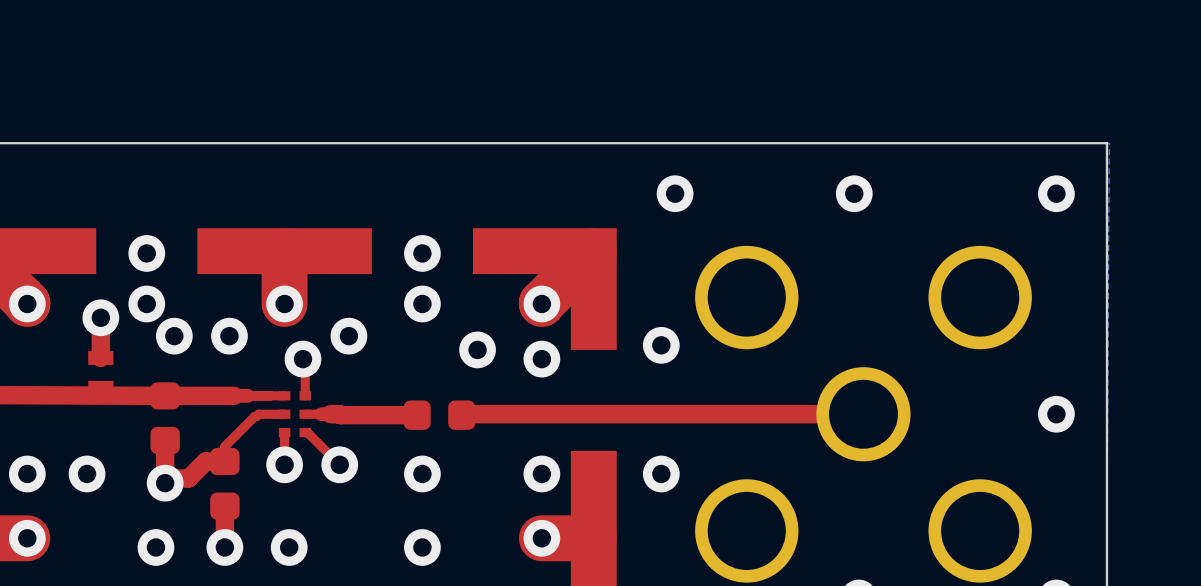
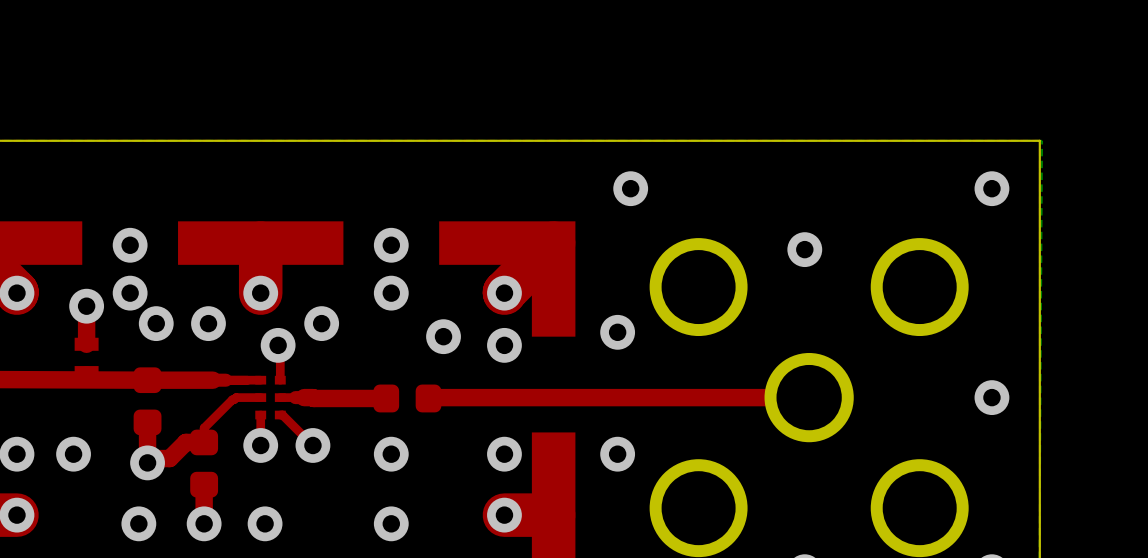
via position: (854, 193) -> (804, 249)

